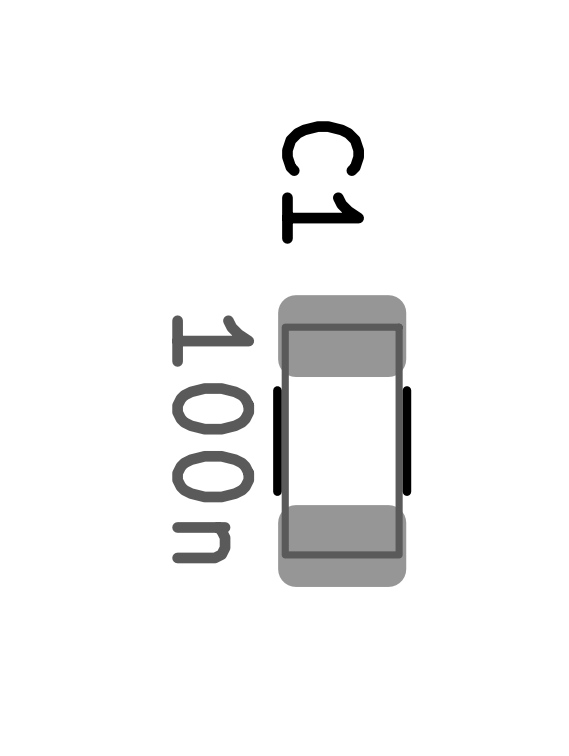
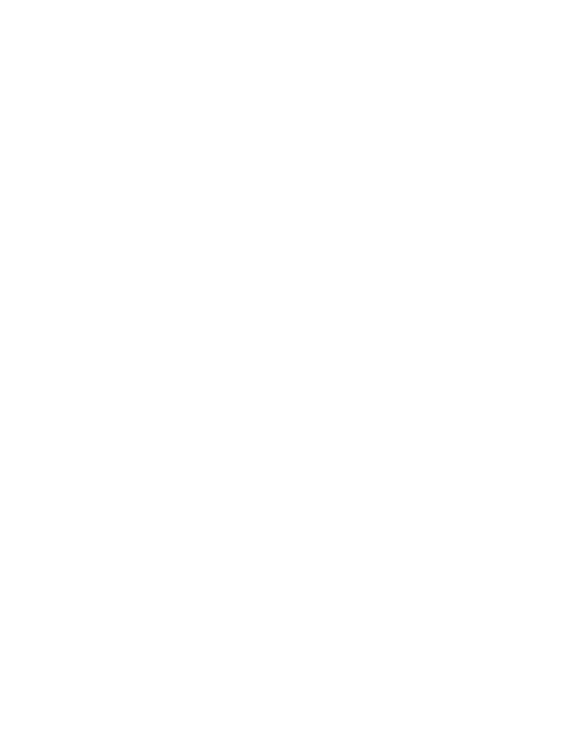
C1: 100n (342, 441) -> none

